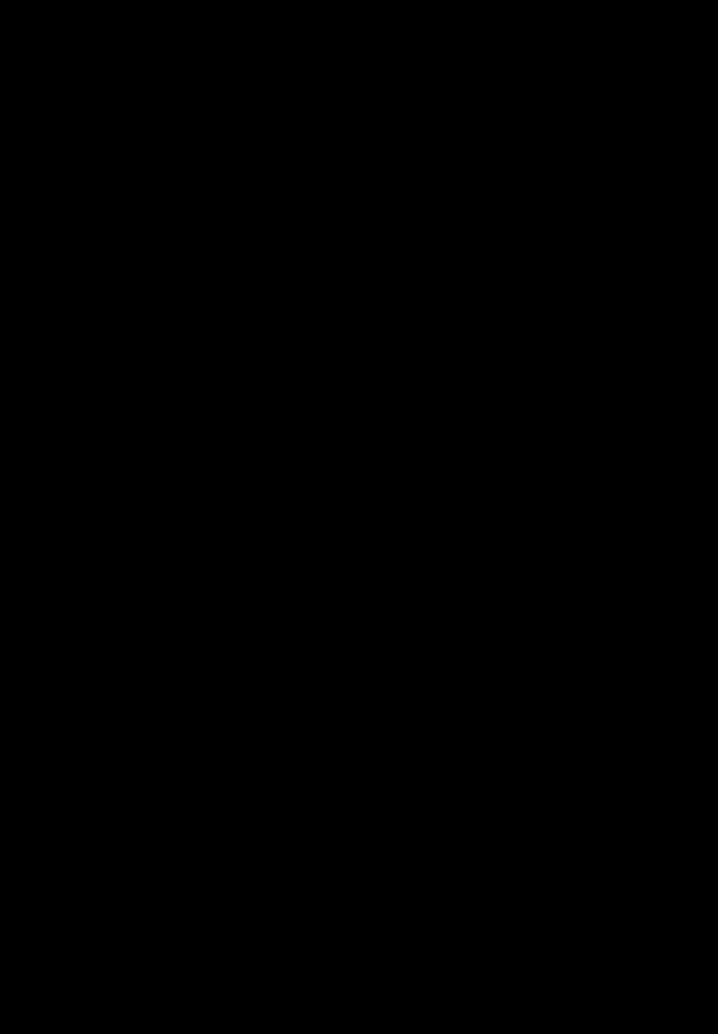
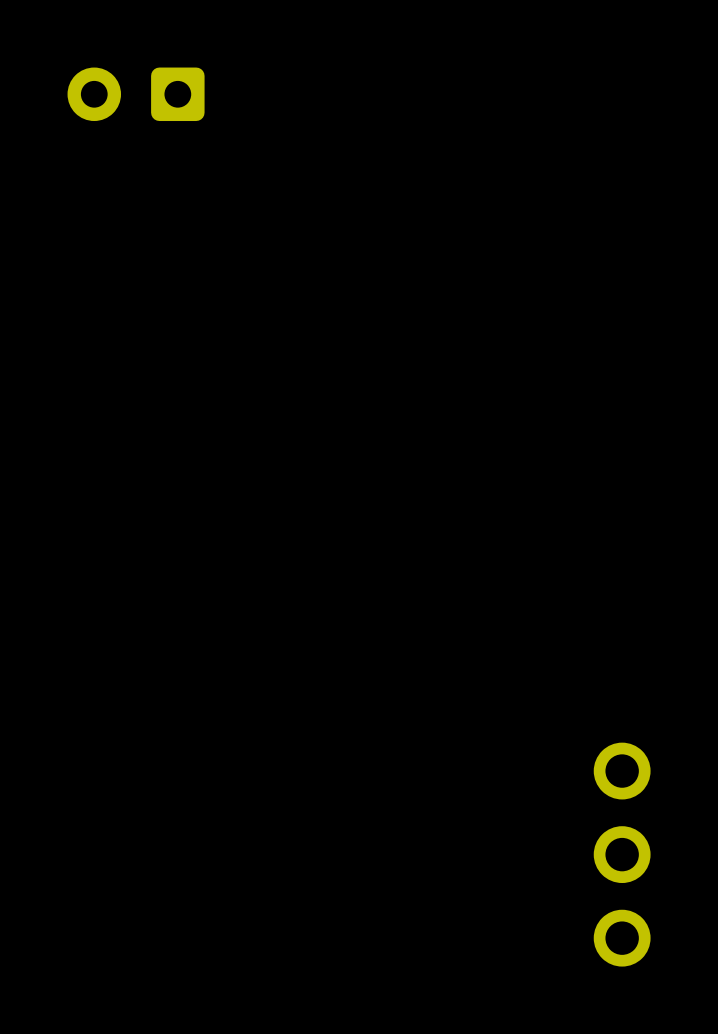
part: none -> (136, 94)
part: none -> (622, 854)

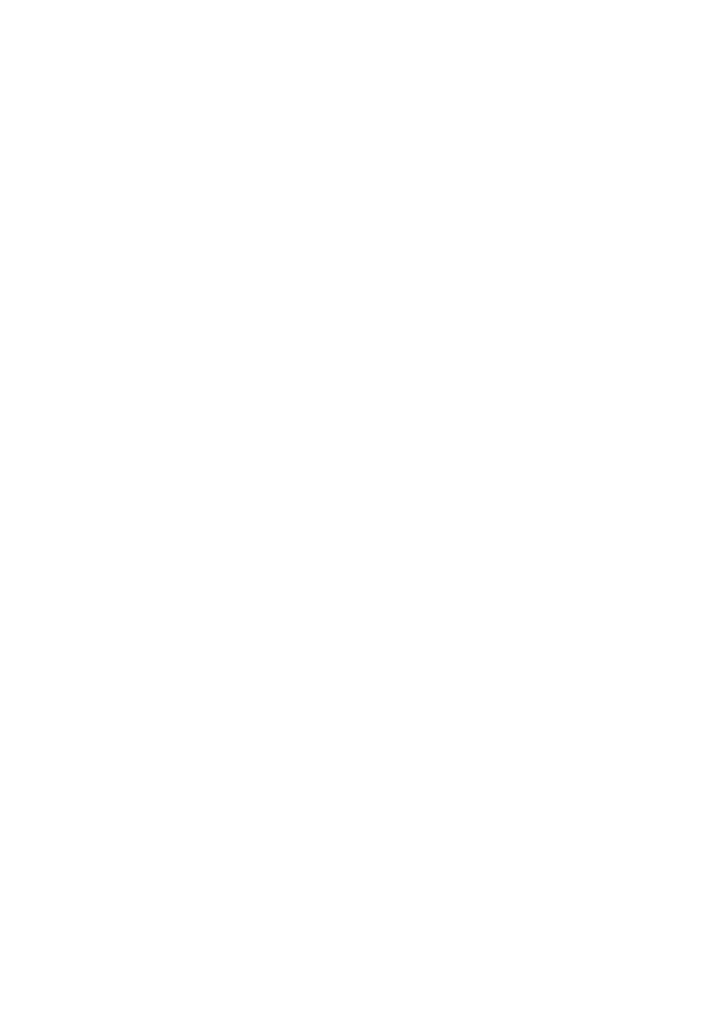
part: (136, 94) -> none
part: (622, 854) -> none

